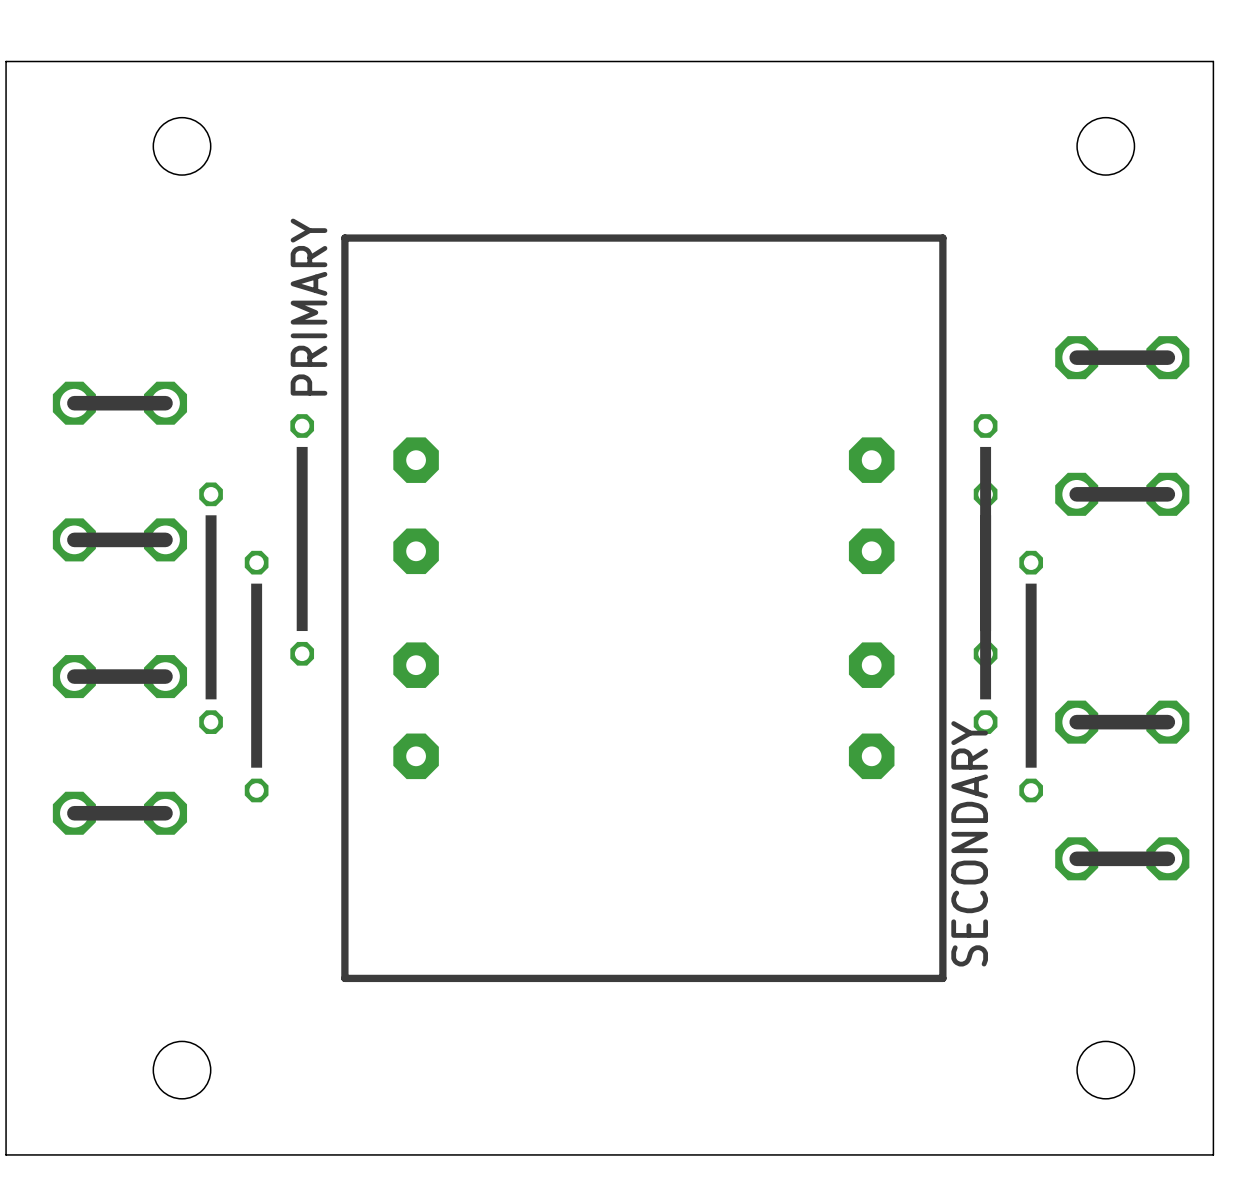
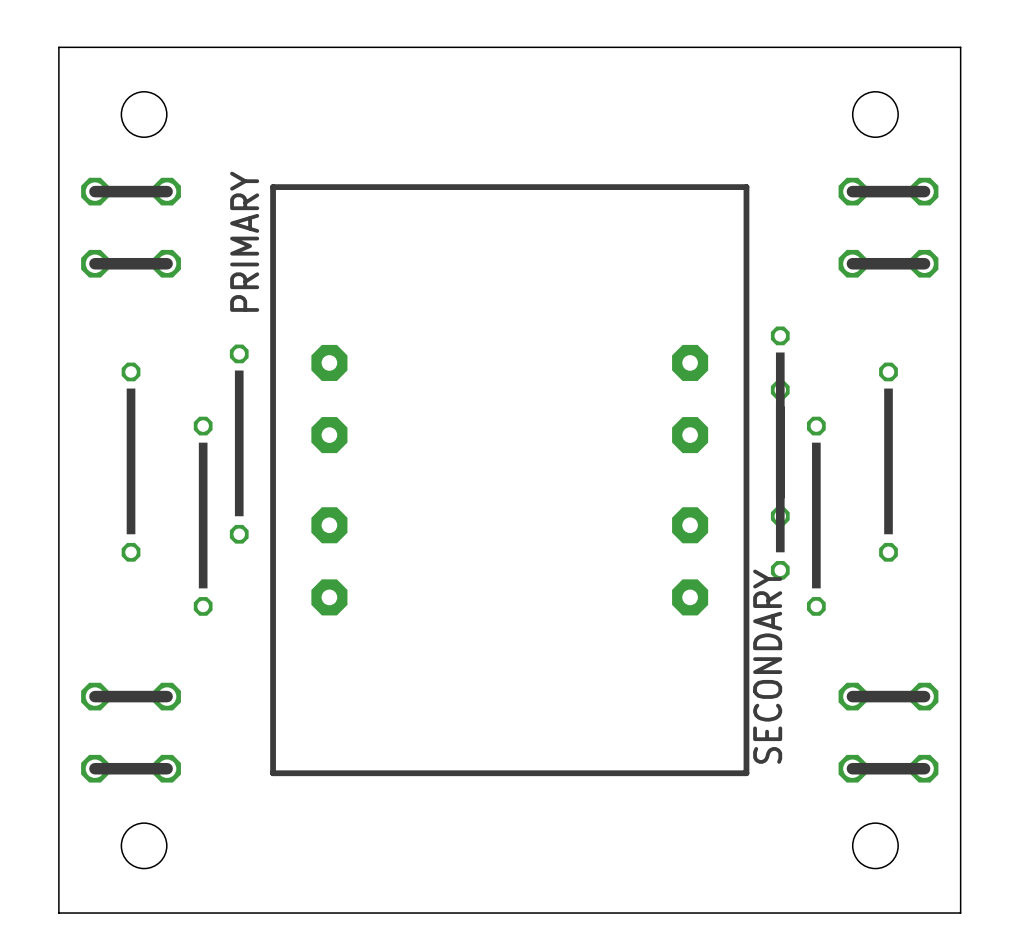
board edge: (74, 61) (6, 61) (6, 1154) (74, 1154) -> (58, 47) (58, 913)
part: none -> (131, 191)
part: none -> (888, 191)
part: none -> (131, 263)
part: none -> (888, 263)
part: (1122, 357) -> none
part: (119, 403) -> none
part: (1122, 494) -> none
part: (119, 539) -> none
part position: (302, 539) -> (239, 444)
part: none -> (131, 462)
part: none -> (888, 462)
part: (211, 608) -> none
part: (119, 676) -> none
part position: (256, 676) -> (203, 516)
part position: (1031, 676) -> (816, 516)
part: (1122, 722) -> none
part: (119, 813) -> none
part: (1122, 858) -> none
part: none -> (131, 696)
part: none -> (888, 696)
part: none -> (131, 768)
part: none -> (888, 768)

